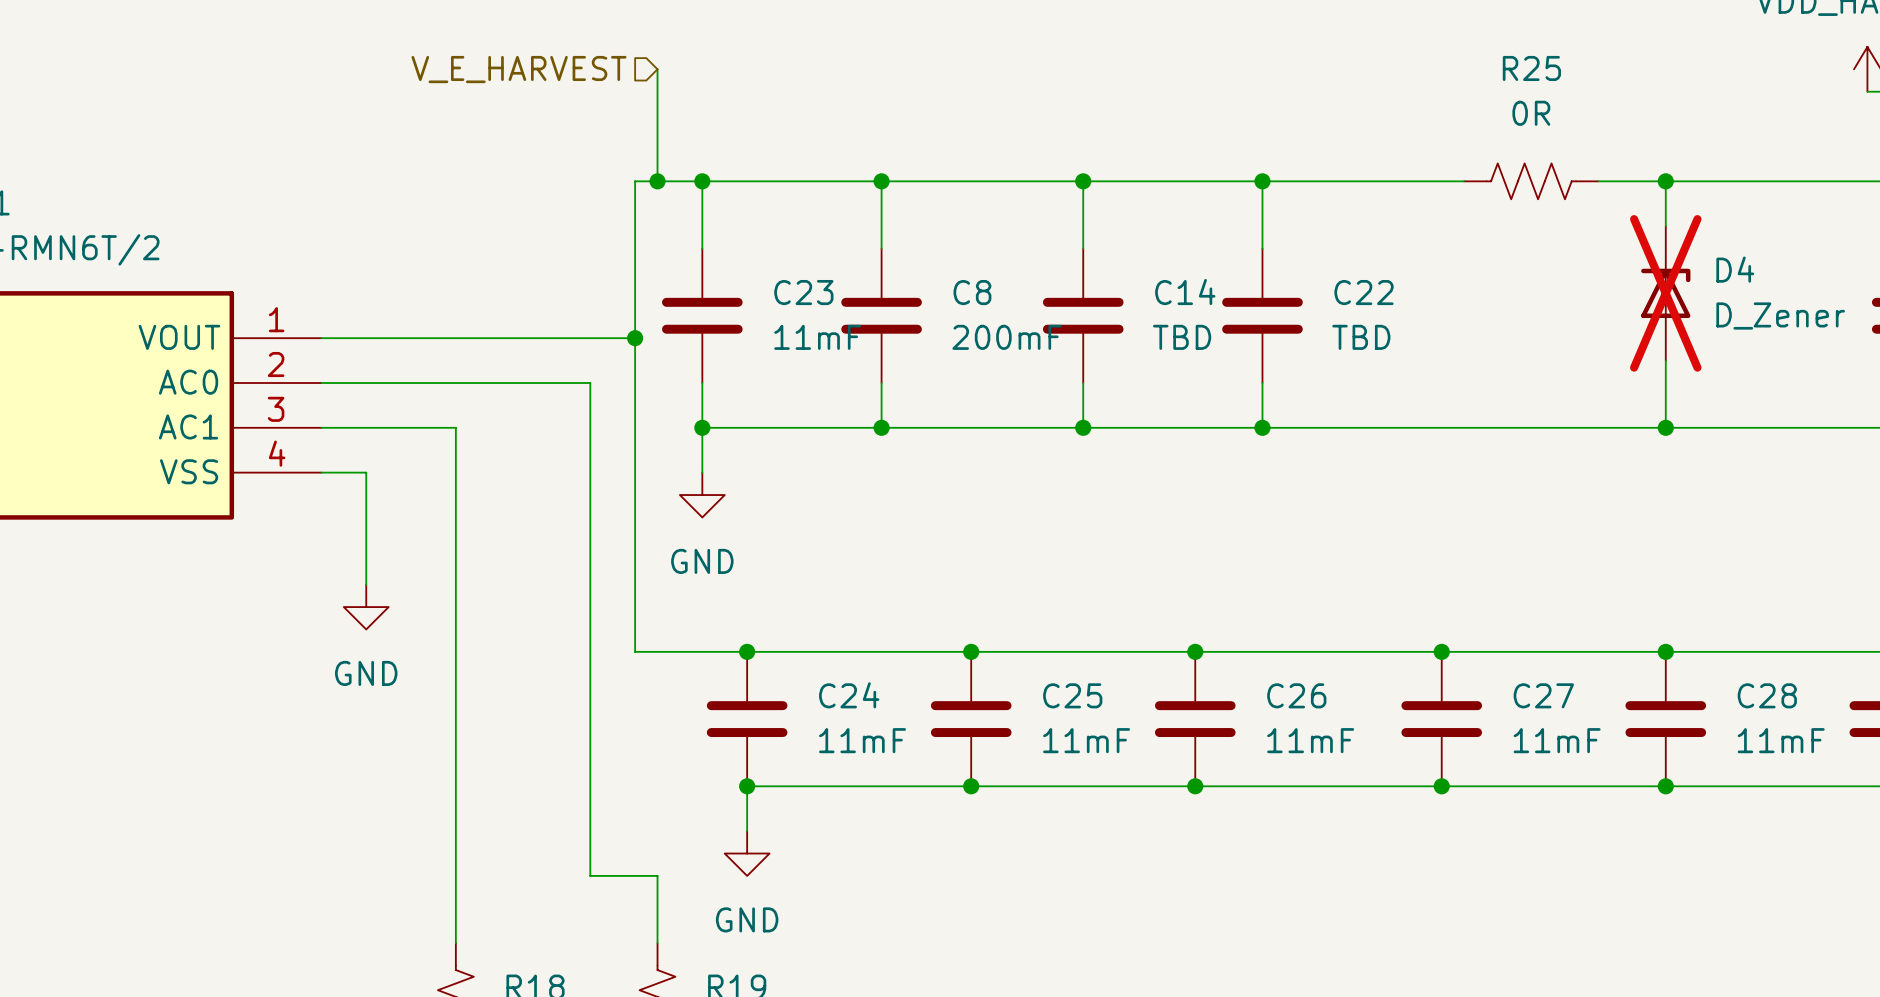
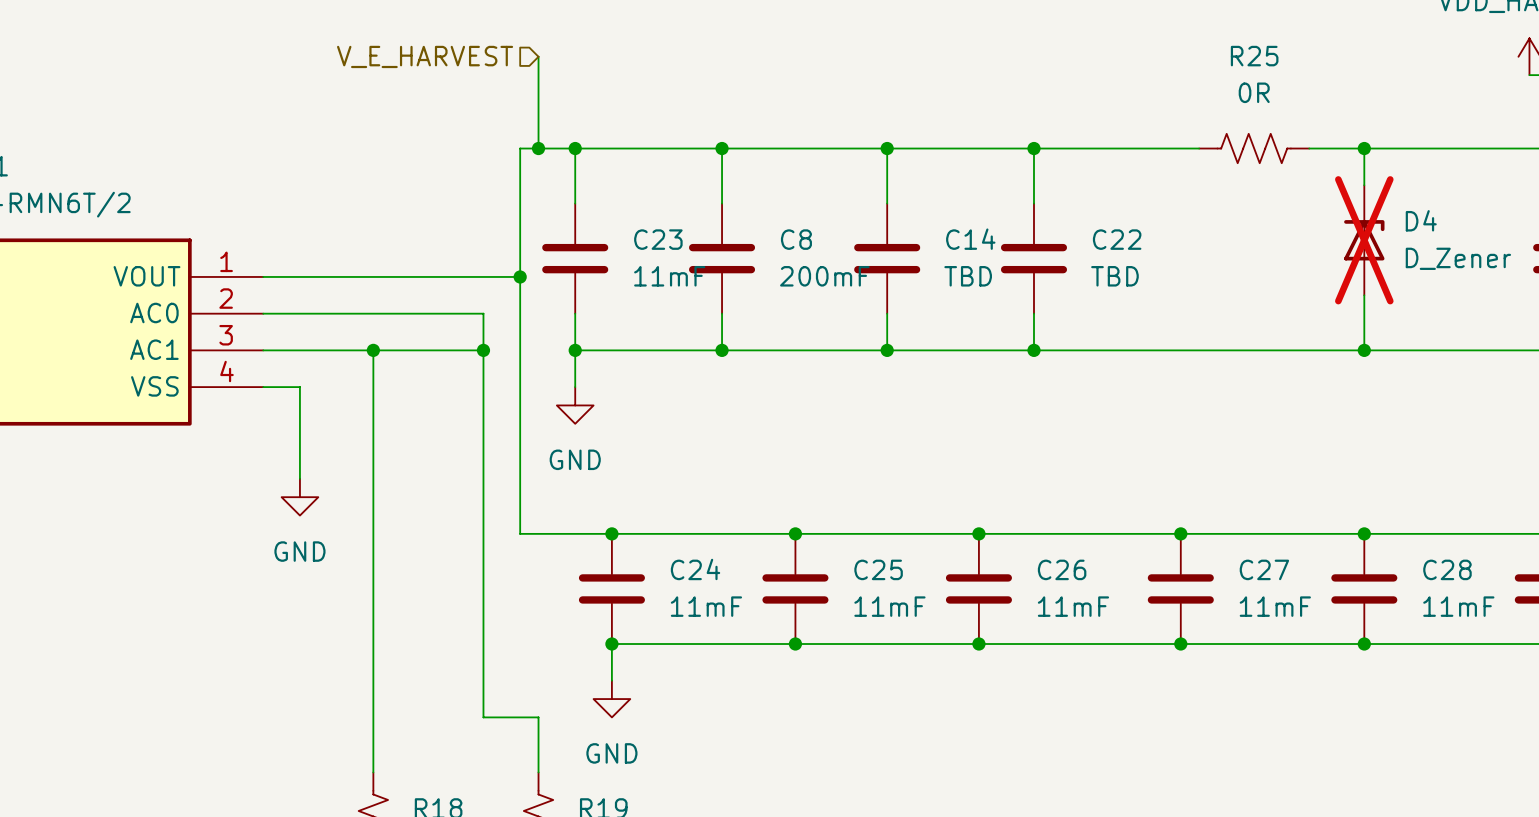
wire: none -> (373, 350) (483, 350)
junction: none -> (373, 350)
junction: none -> (483, 350)

